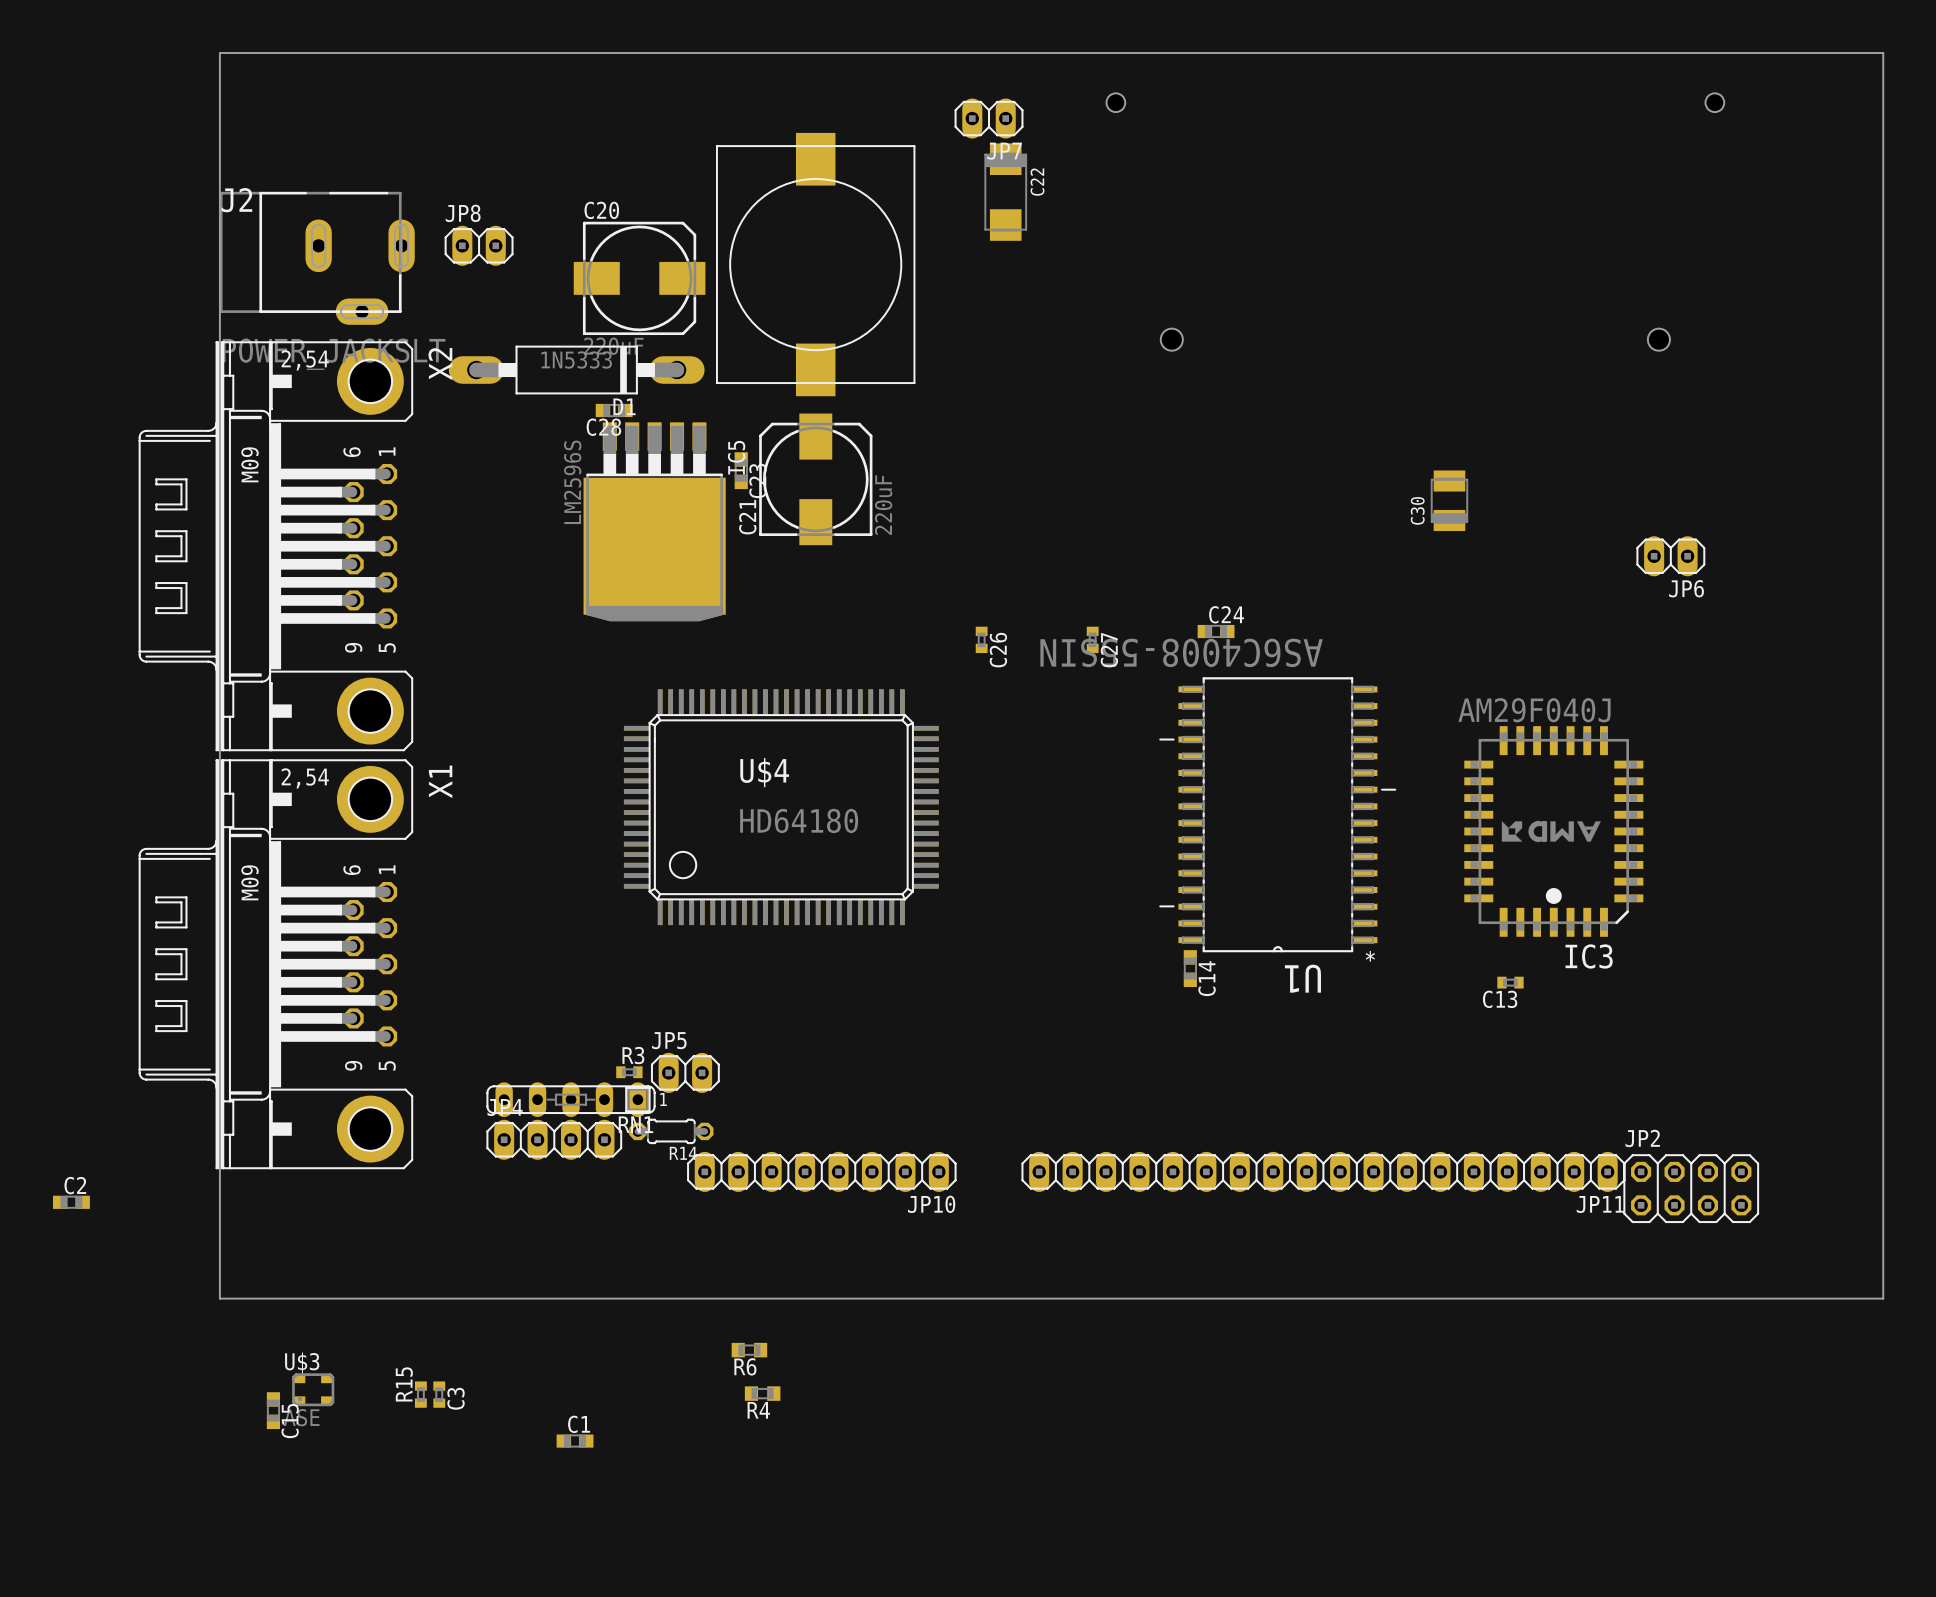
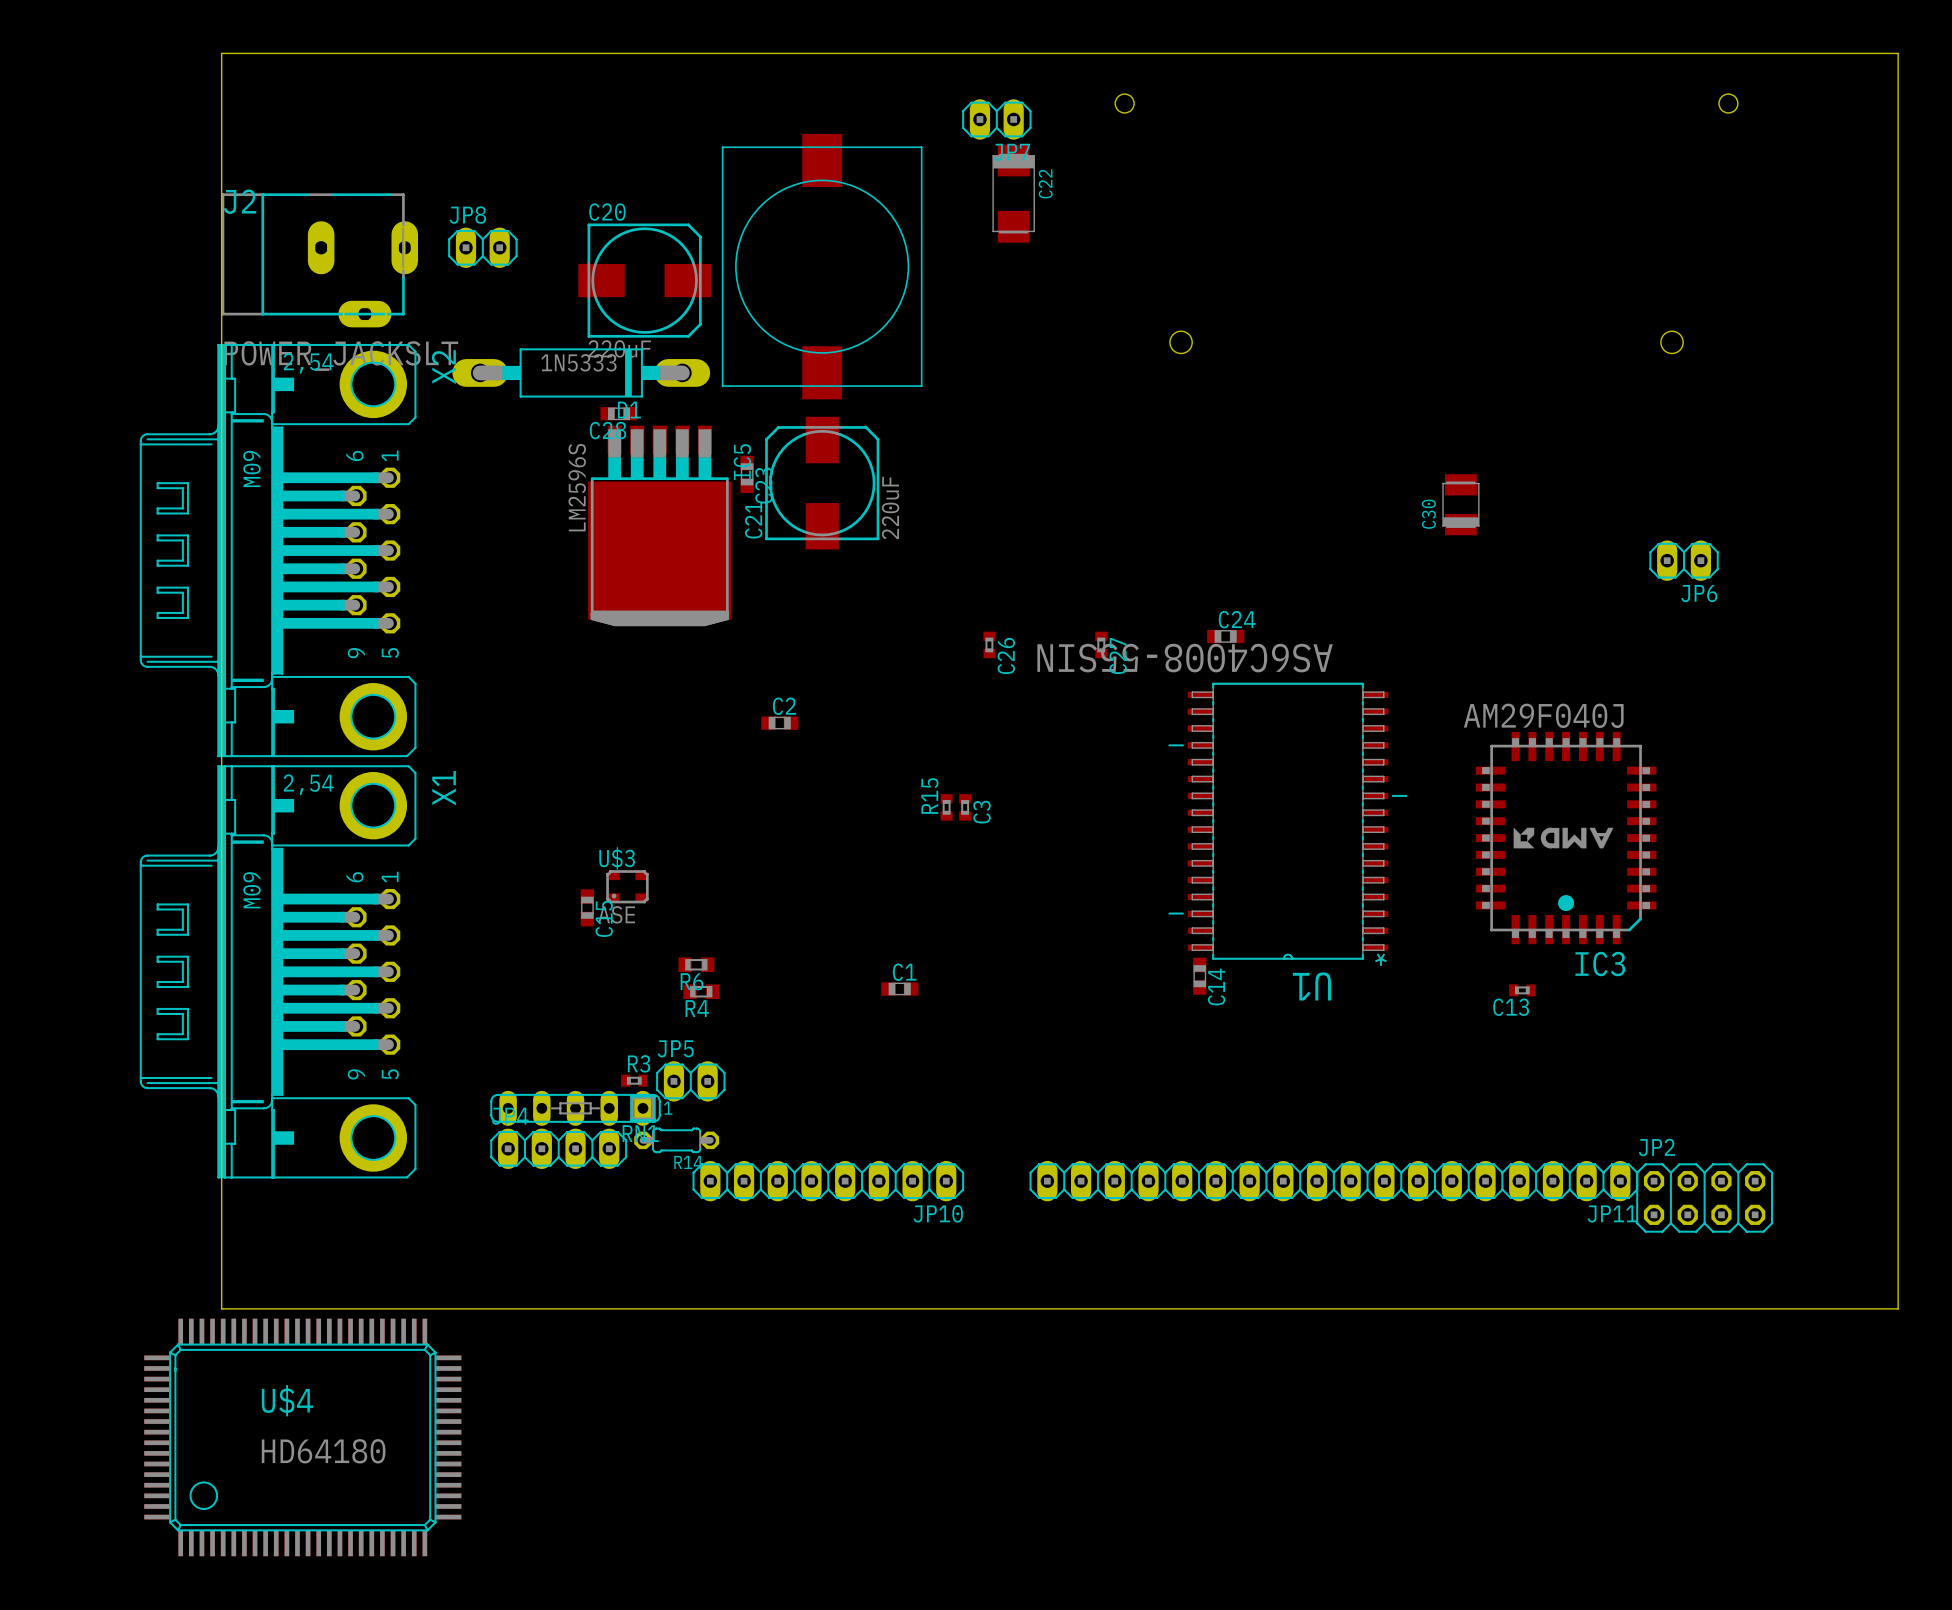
U$4 position: (781, 807) -> (302, 1437)
C2 position: (71, 1202) -> (779, 723)
R6 position: (749, 1350) -> (696, 964)
U$3 position: (313, 1389) -> (627, 886)
R4 position: (762, 1393) -> (701, 991)
R15 position: (420, 1394) -> (946, 807)
C3 position: (439, 1394) -> (965, 807)
C15 position: (273, 1410) -> (587, 907)
C1 position: (575, 1441) -> (899, 989)

